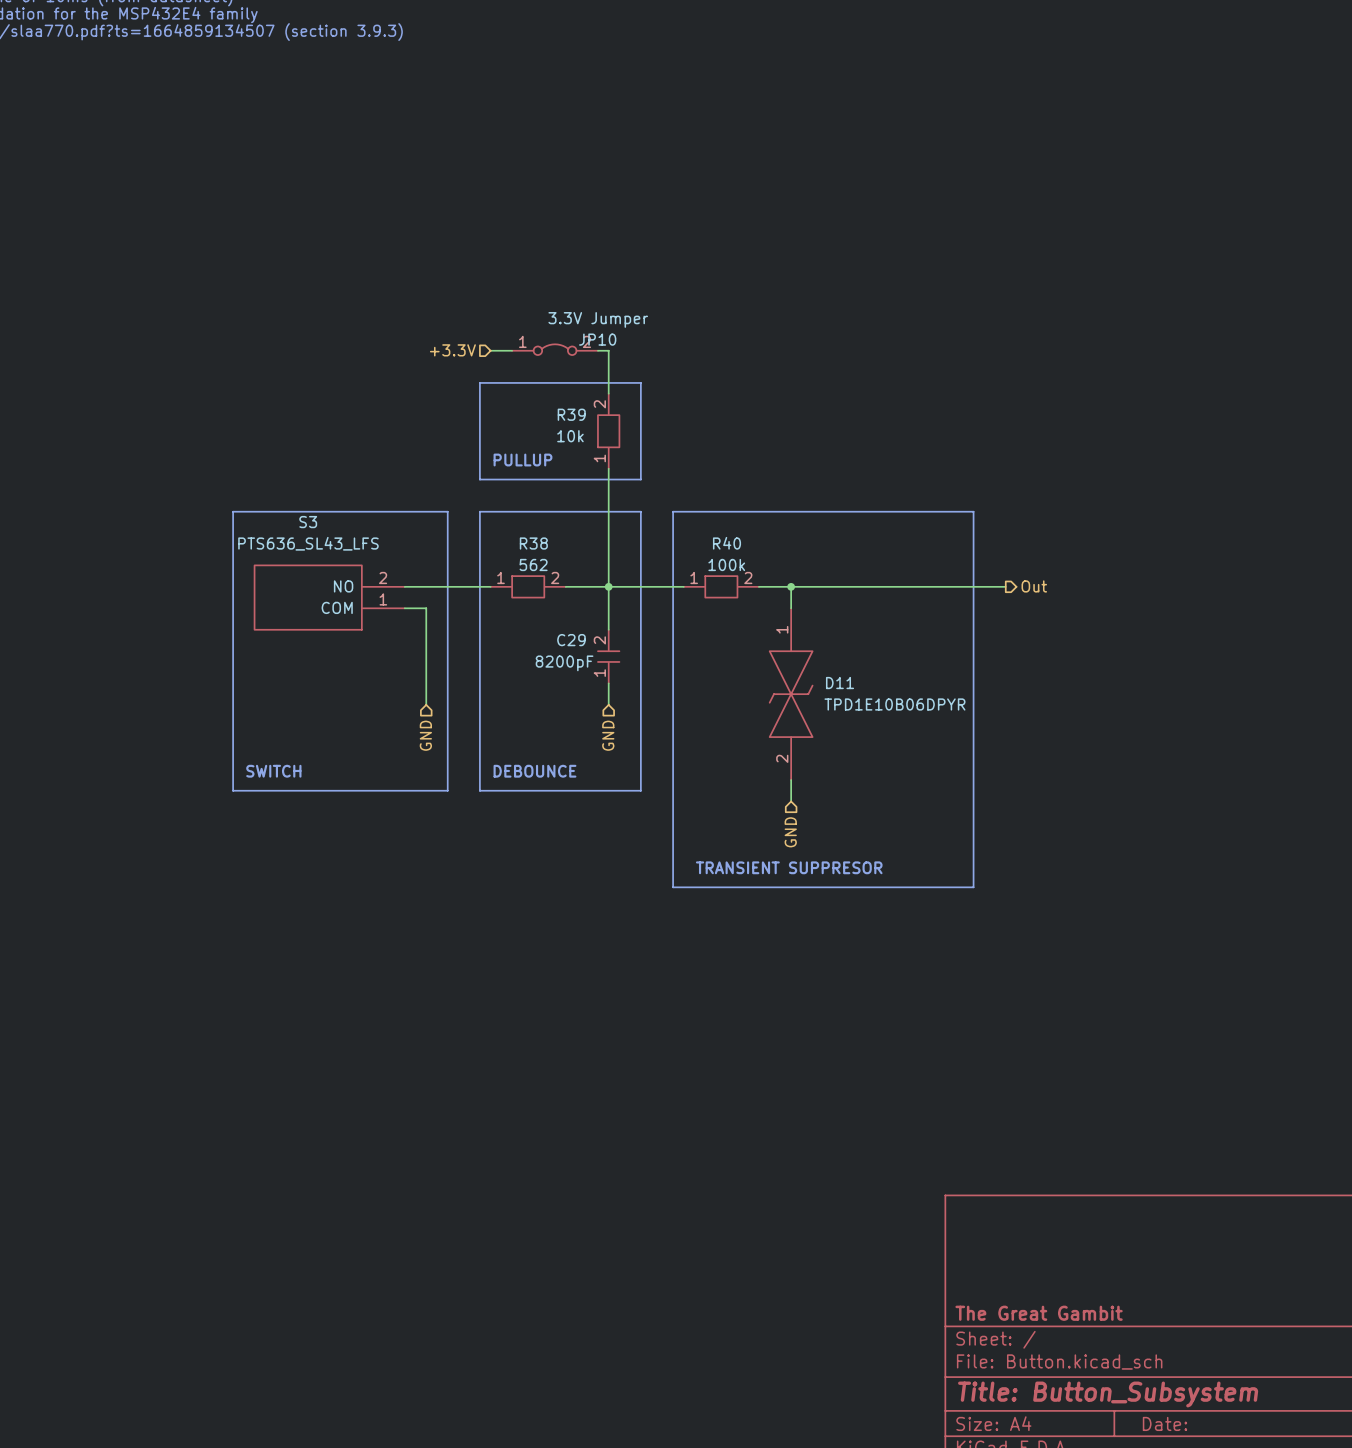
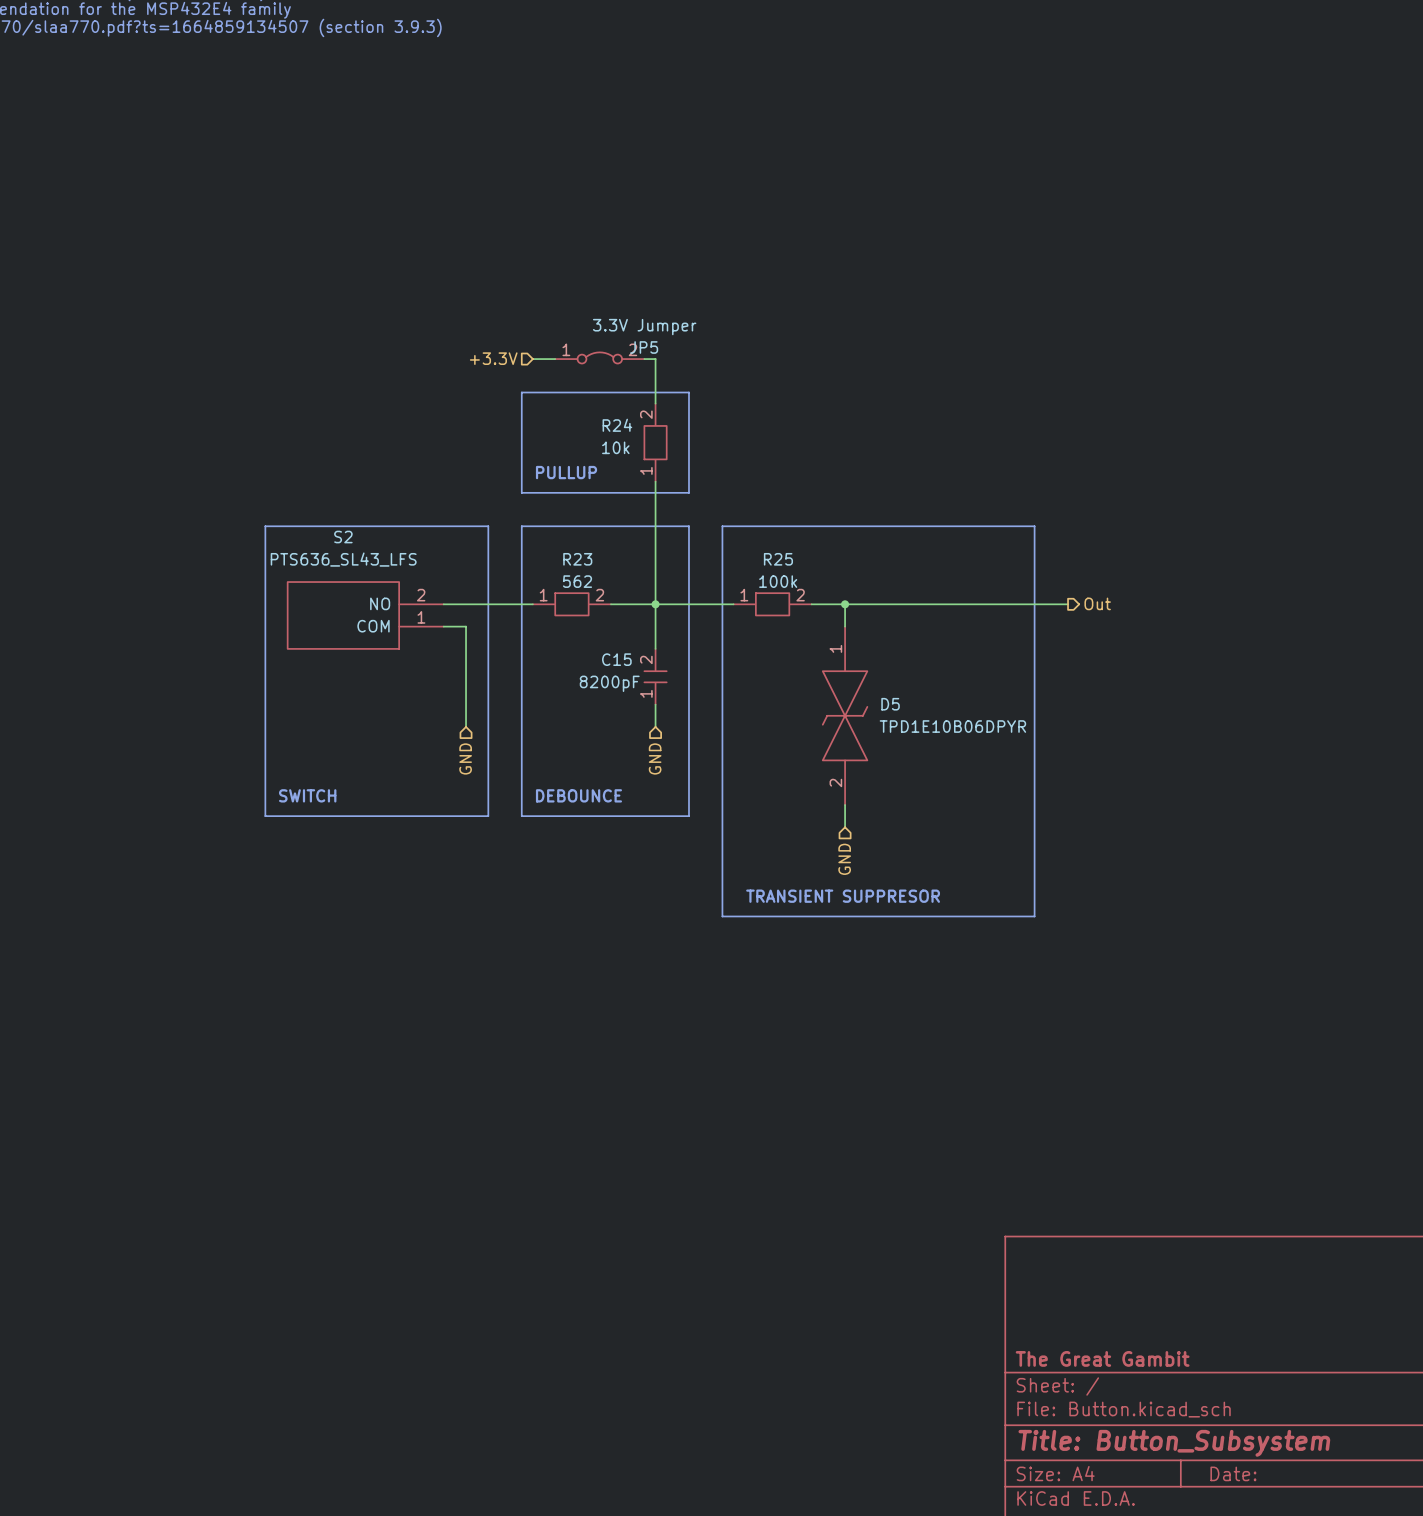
JP10 name: JP10 (597, 339) -> JP5 (644, 347)
R39 name: R39 (571, 414) -> R24 (617, 425)
S3 name: S3 (308, 522) -> S2 (343, 537)
R38 name: R38 (533, 543) -> R23 (577, 559)
R40 name: R40 (727, 543) -> R25 (778, 559)
C29 name: C29 (571, 640) -> C15 (616, 659)
D11 name: D11 (840, 683) -> D5 (890, 704)

